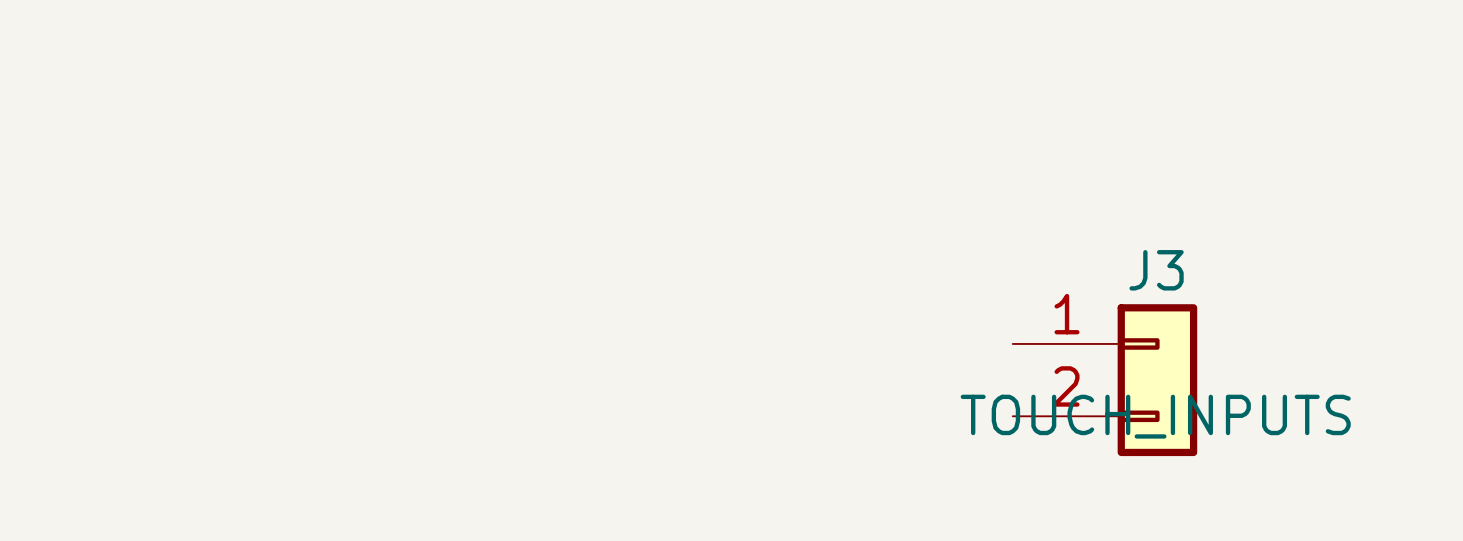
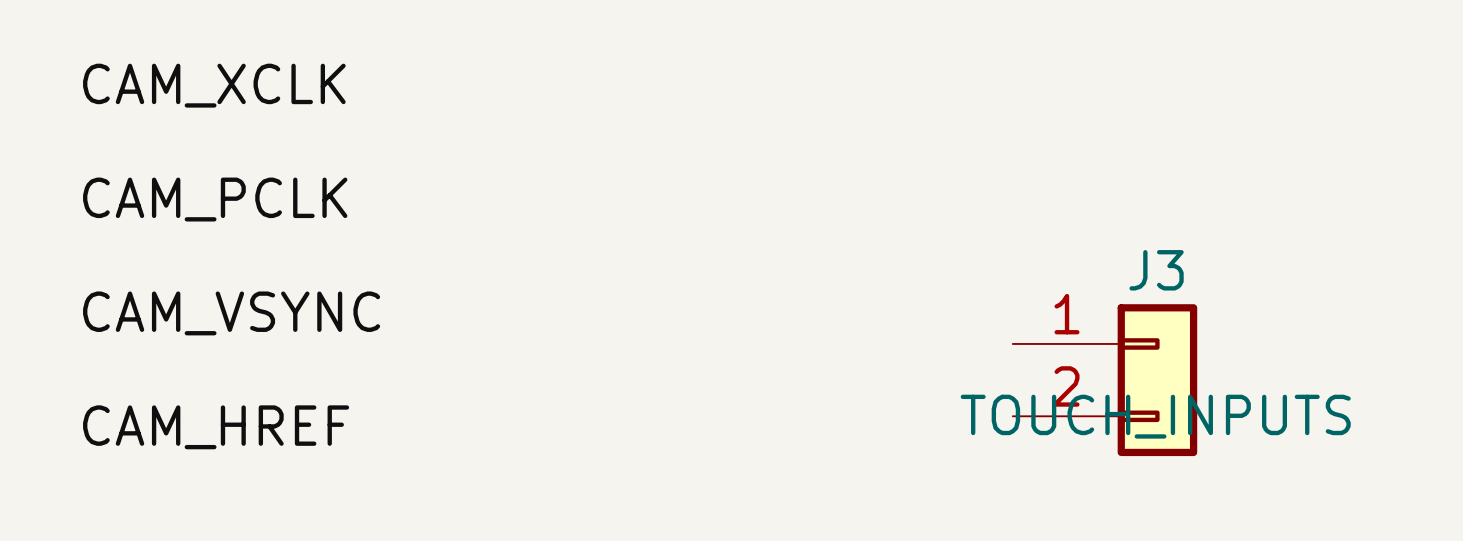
label: none -> CAM_XCLK (214, 85)
label: none -> CAM_PCLK (215, 199)
label: none -> CAM_VSYNC (231, 313)
label: none -> CAM_HREF (216, 427)

